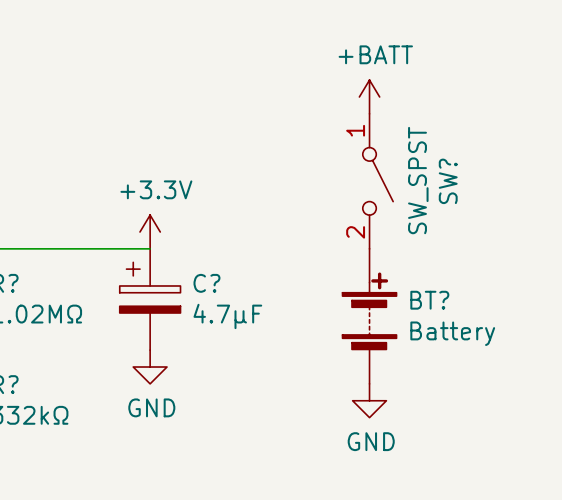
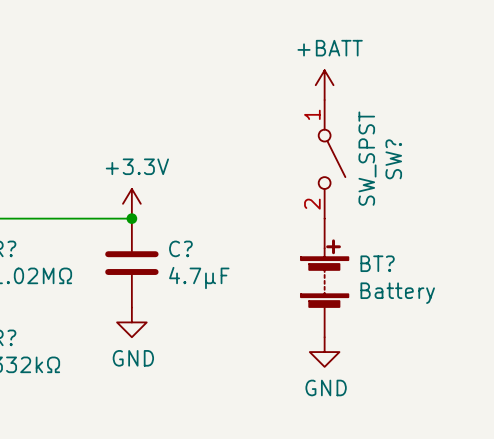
C? symbol: [119, 248, 181, 351] -> [105, 218, 159, 308]
junction: none -> (131, 218)

